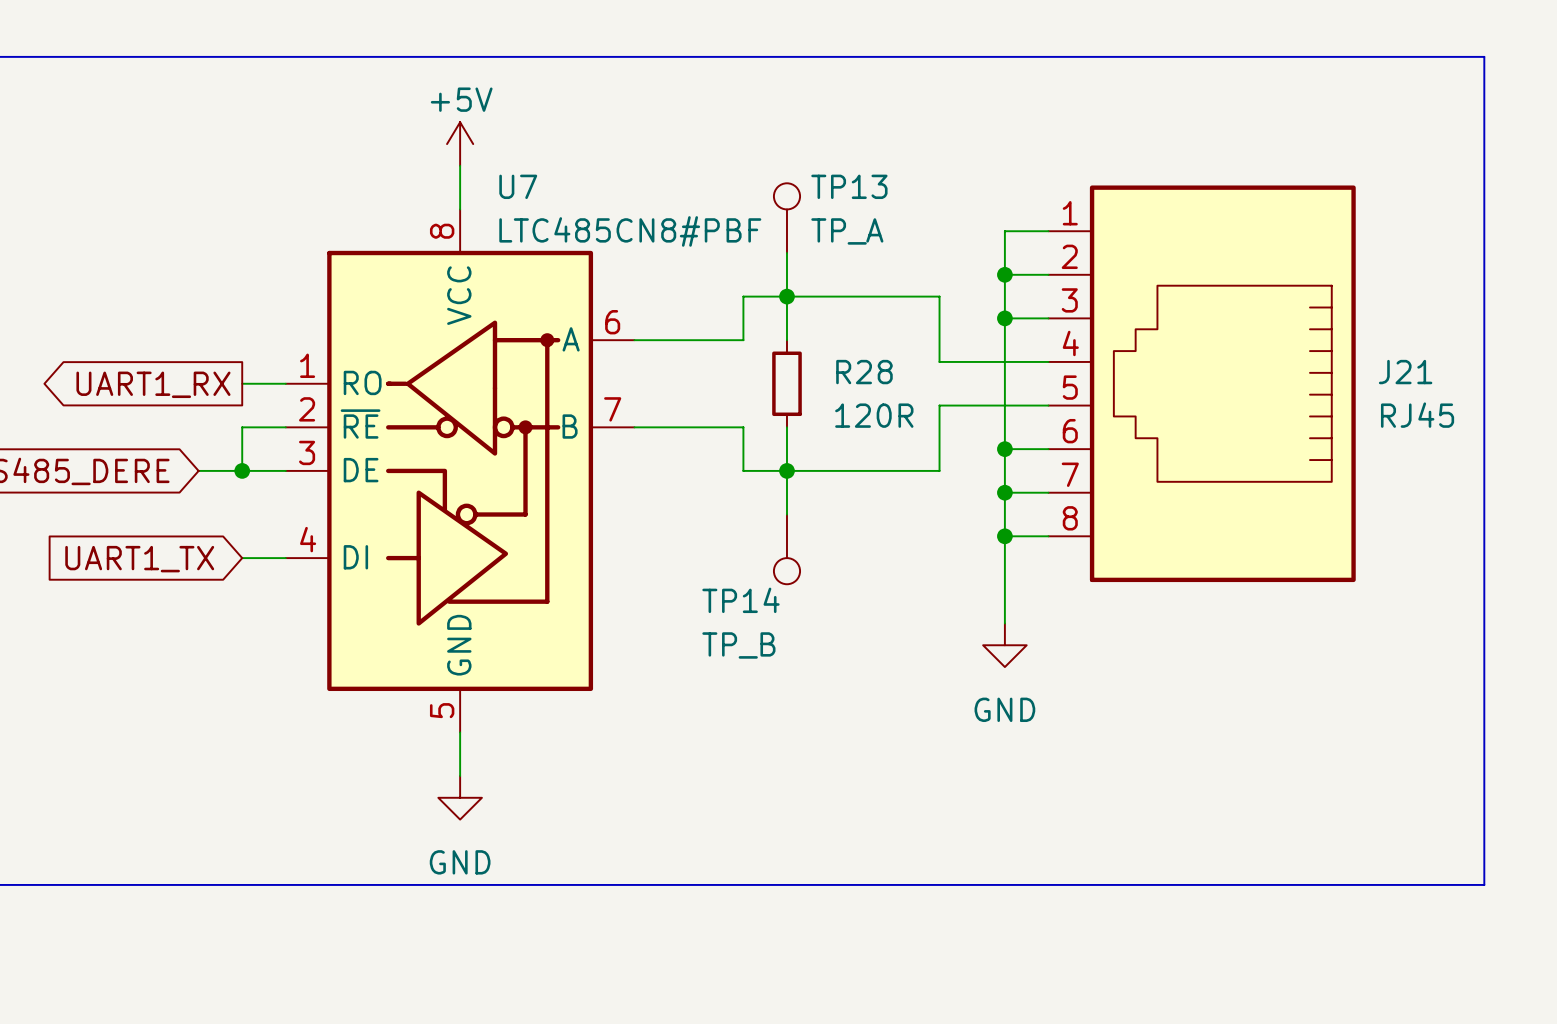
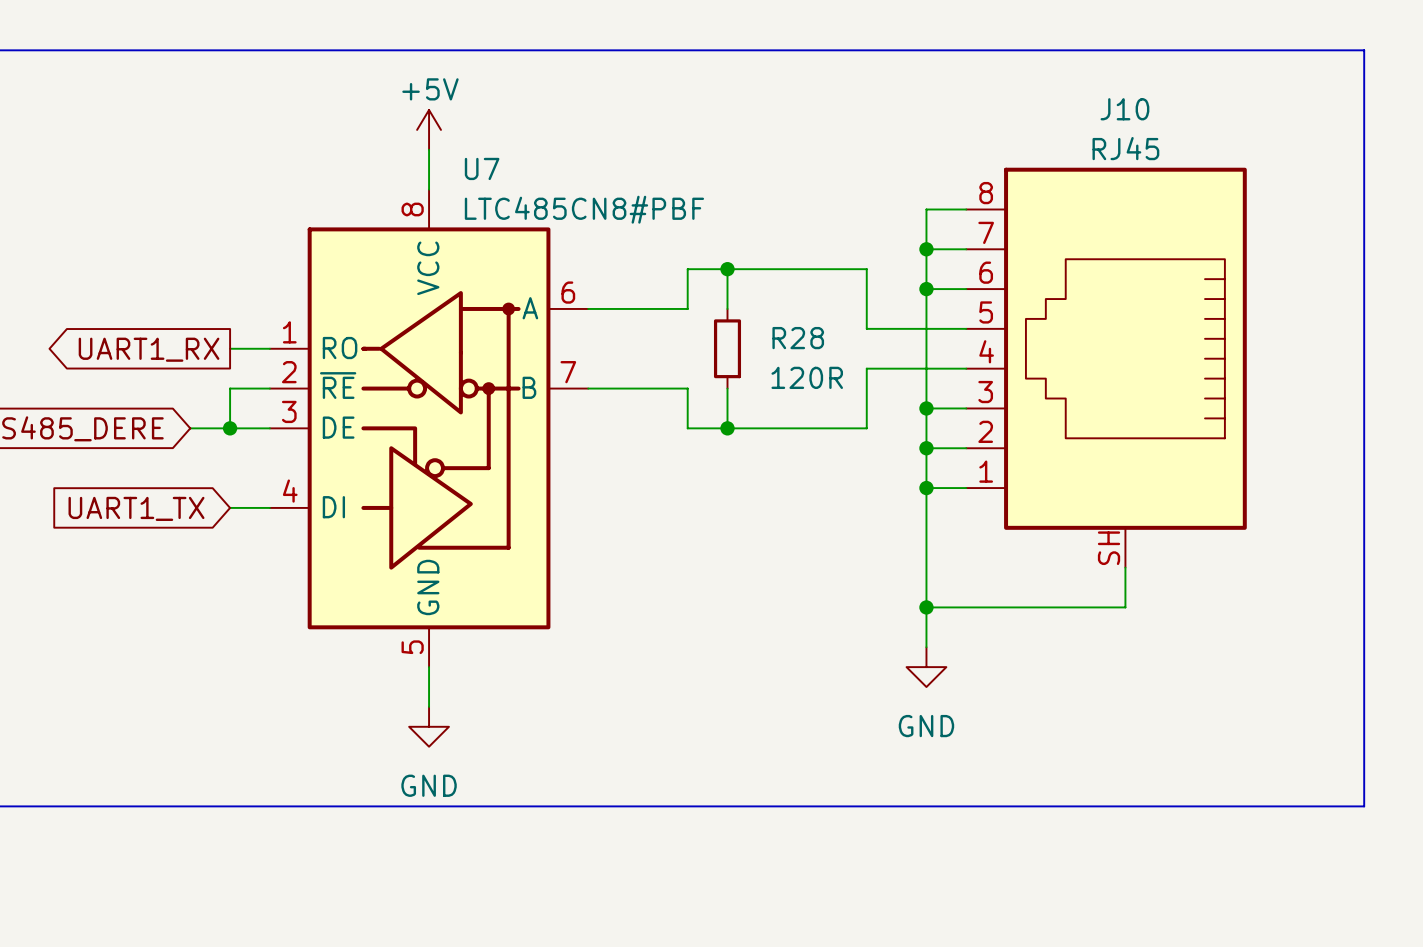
TP13: TP_A (786, 218) -> none
wire: (786, 253) (786, 296) -> none
J21: RJ45 (1202, 383) -> none
J10: none -> RJ45 (1106, 367)
wire: (786, 470) (786, 514) -> none
TP14: TP_B (786, 549) -> none
wire: none -> (926, 567) (926, 647)
wire: none -> (1125, 567) (1125, 607) (926, 607)
power symbol position: GND (1004, 645) -> GND (926, 667)
junction: none -> (926, 607)

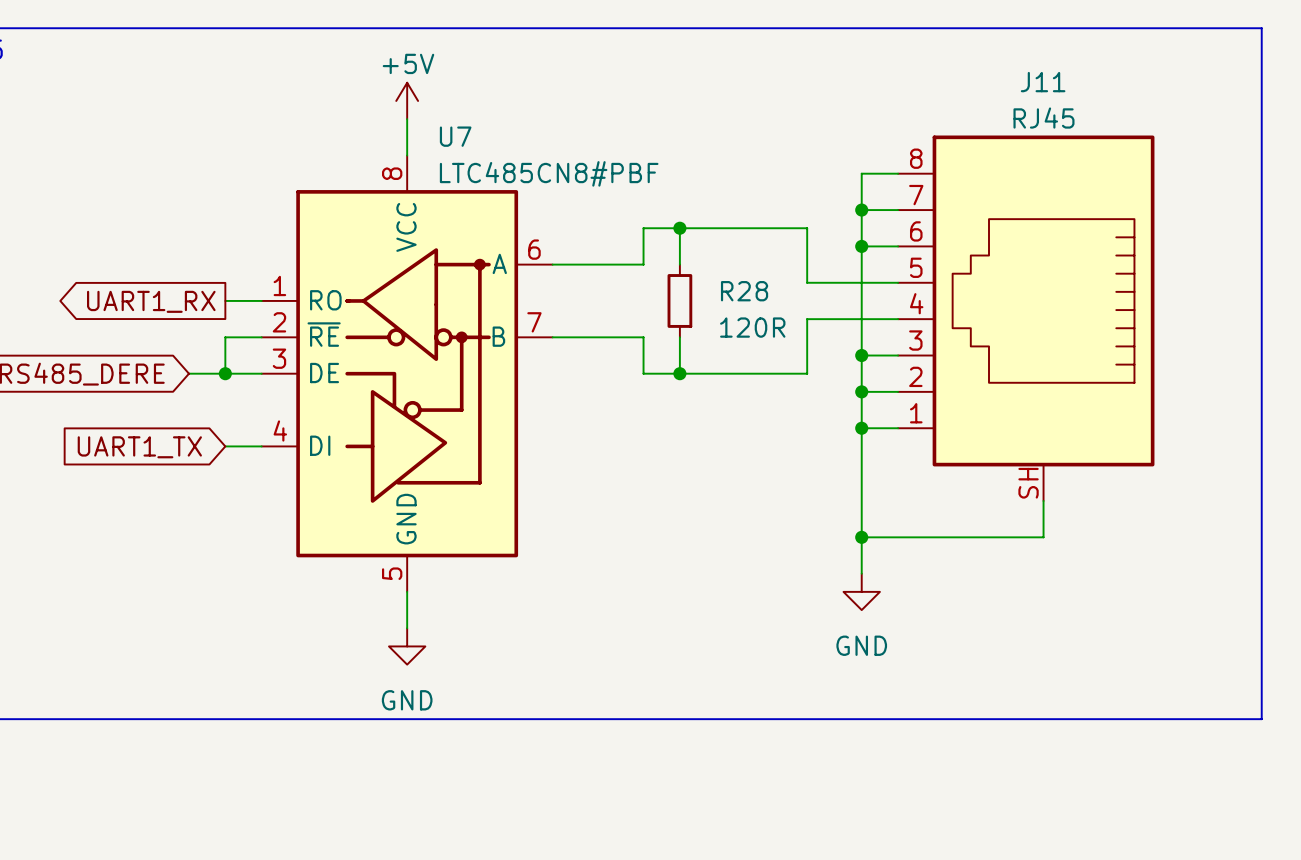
J10 name: J10 (1124, 109) -> J11 (1043, 82)

